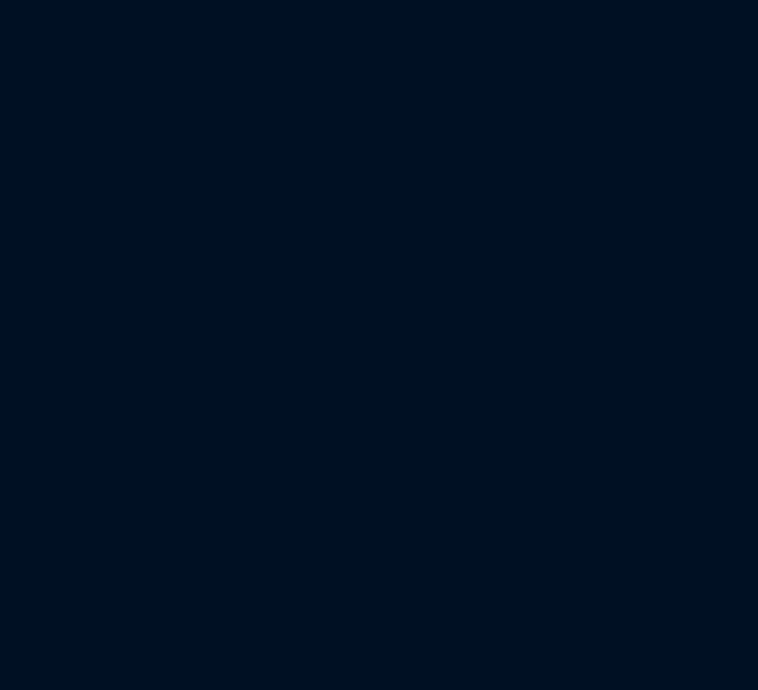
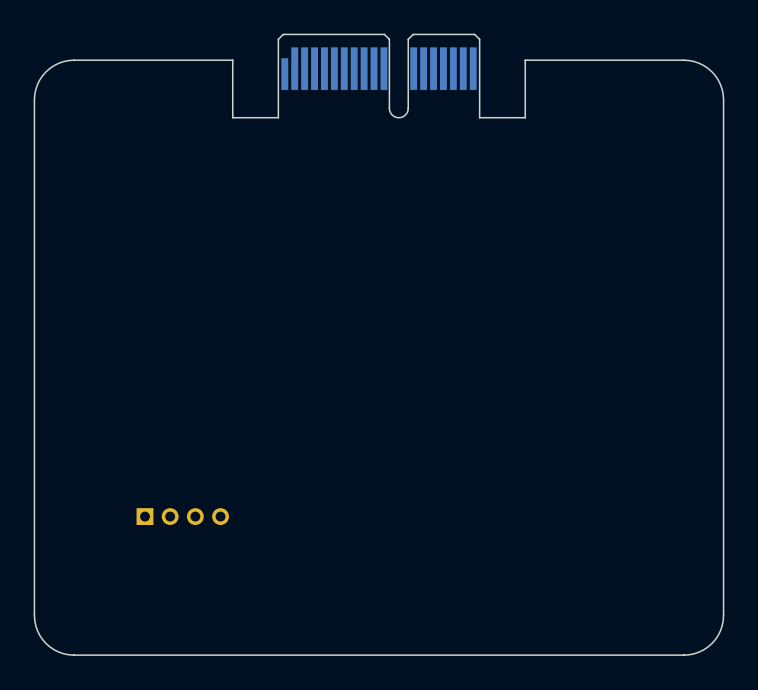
part: none -> (378, 76)
board edge: none -> (479, 117) (525, 117) (525, 60) (689, 60) (708, 68) (720, 84) (723, 99) (723, 615) (720, 630) (715, 639) (703, 649) (683, 655) (74, 655) (58, 652) (46, 643) (39, 635) (34, 615) (34, 99) (37, 84) (49, 68) (68, 60) (232, 60) (232, 117) (278, 117)
part: none -> (182, 516)

